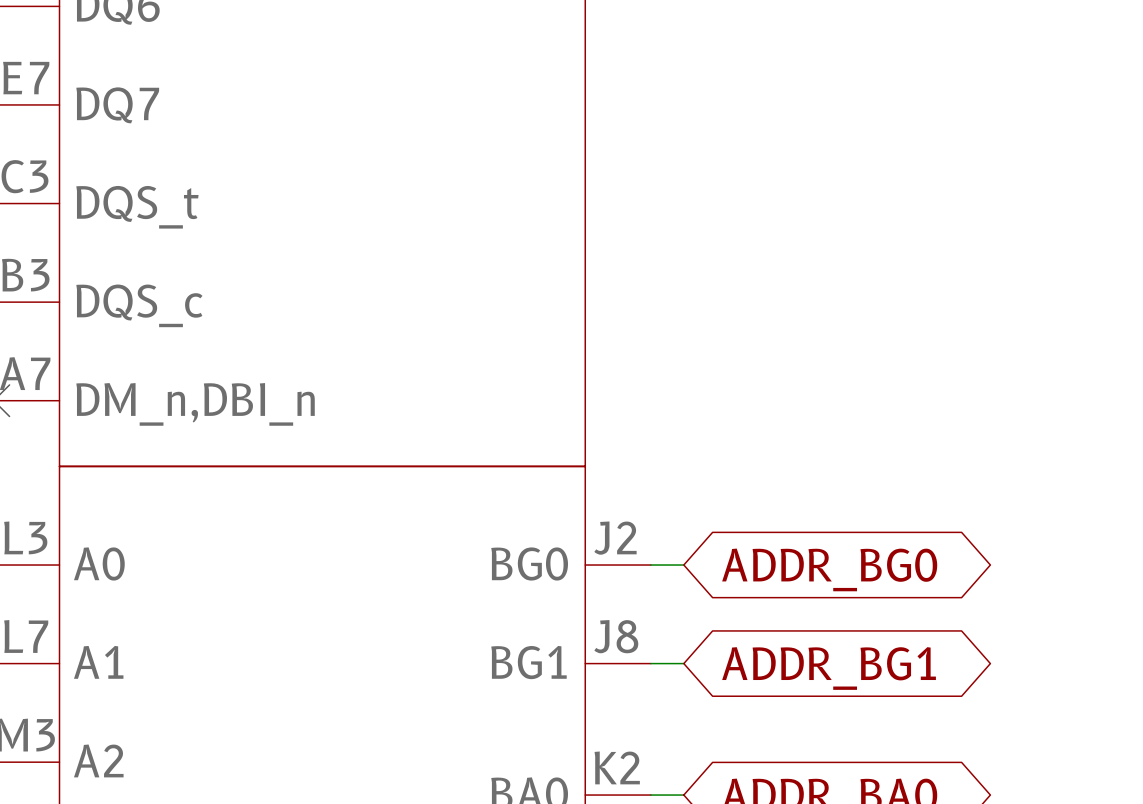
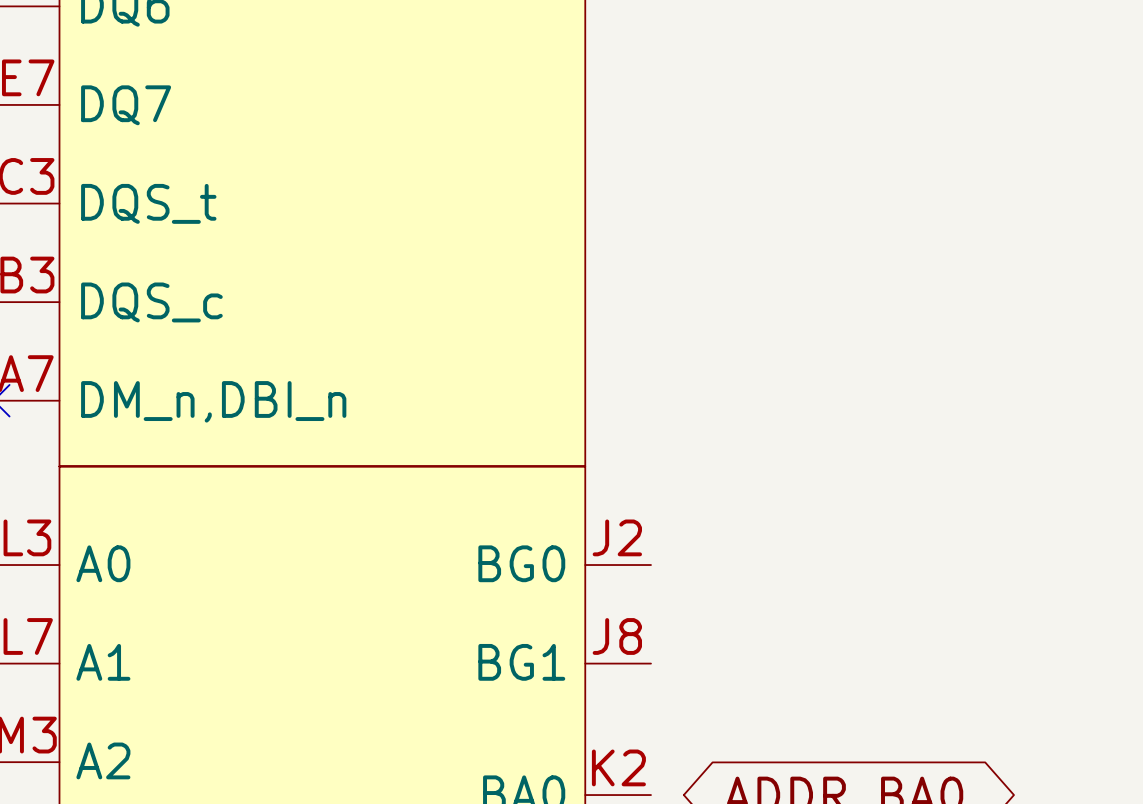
wire: (650, 565) (683, 565) -> none
global label: ADDR_BG0 (829, 569) -> none
wire: (650, 663) (683, 663) -> none
global label: ADDR_BG1 (829, 668) -> none
wire: (650, 795) (683, 795) -> none

